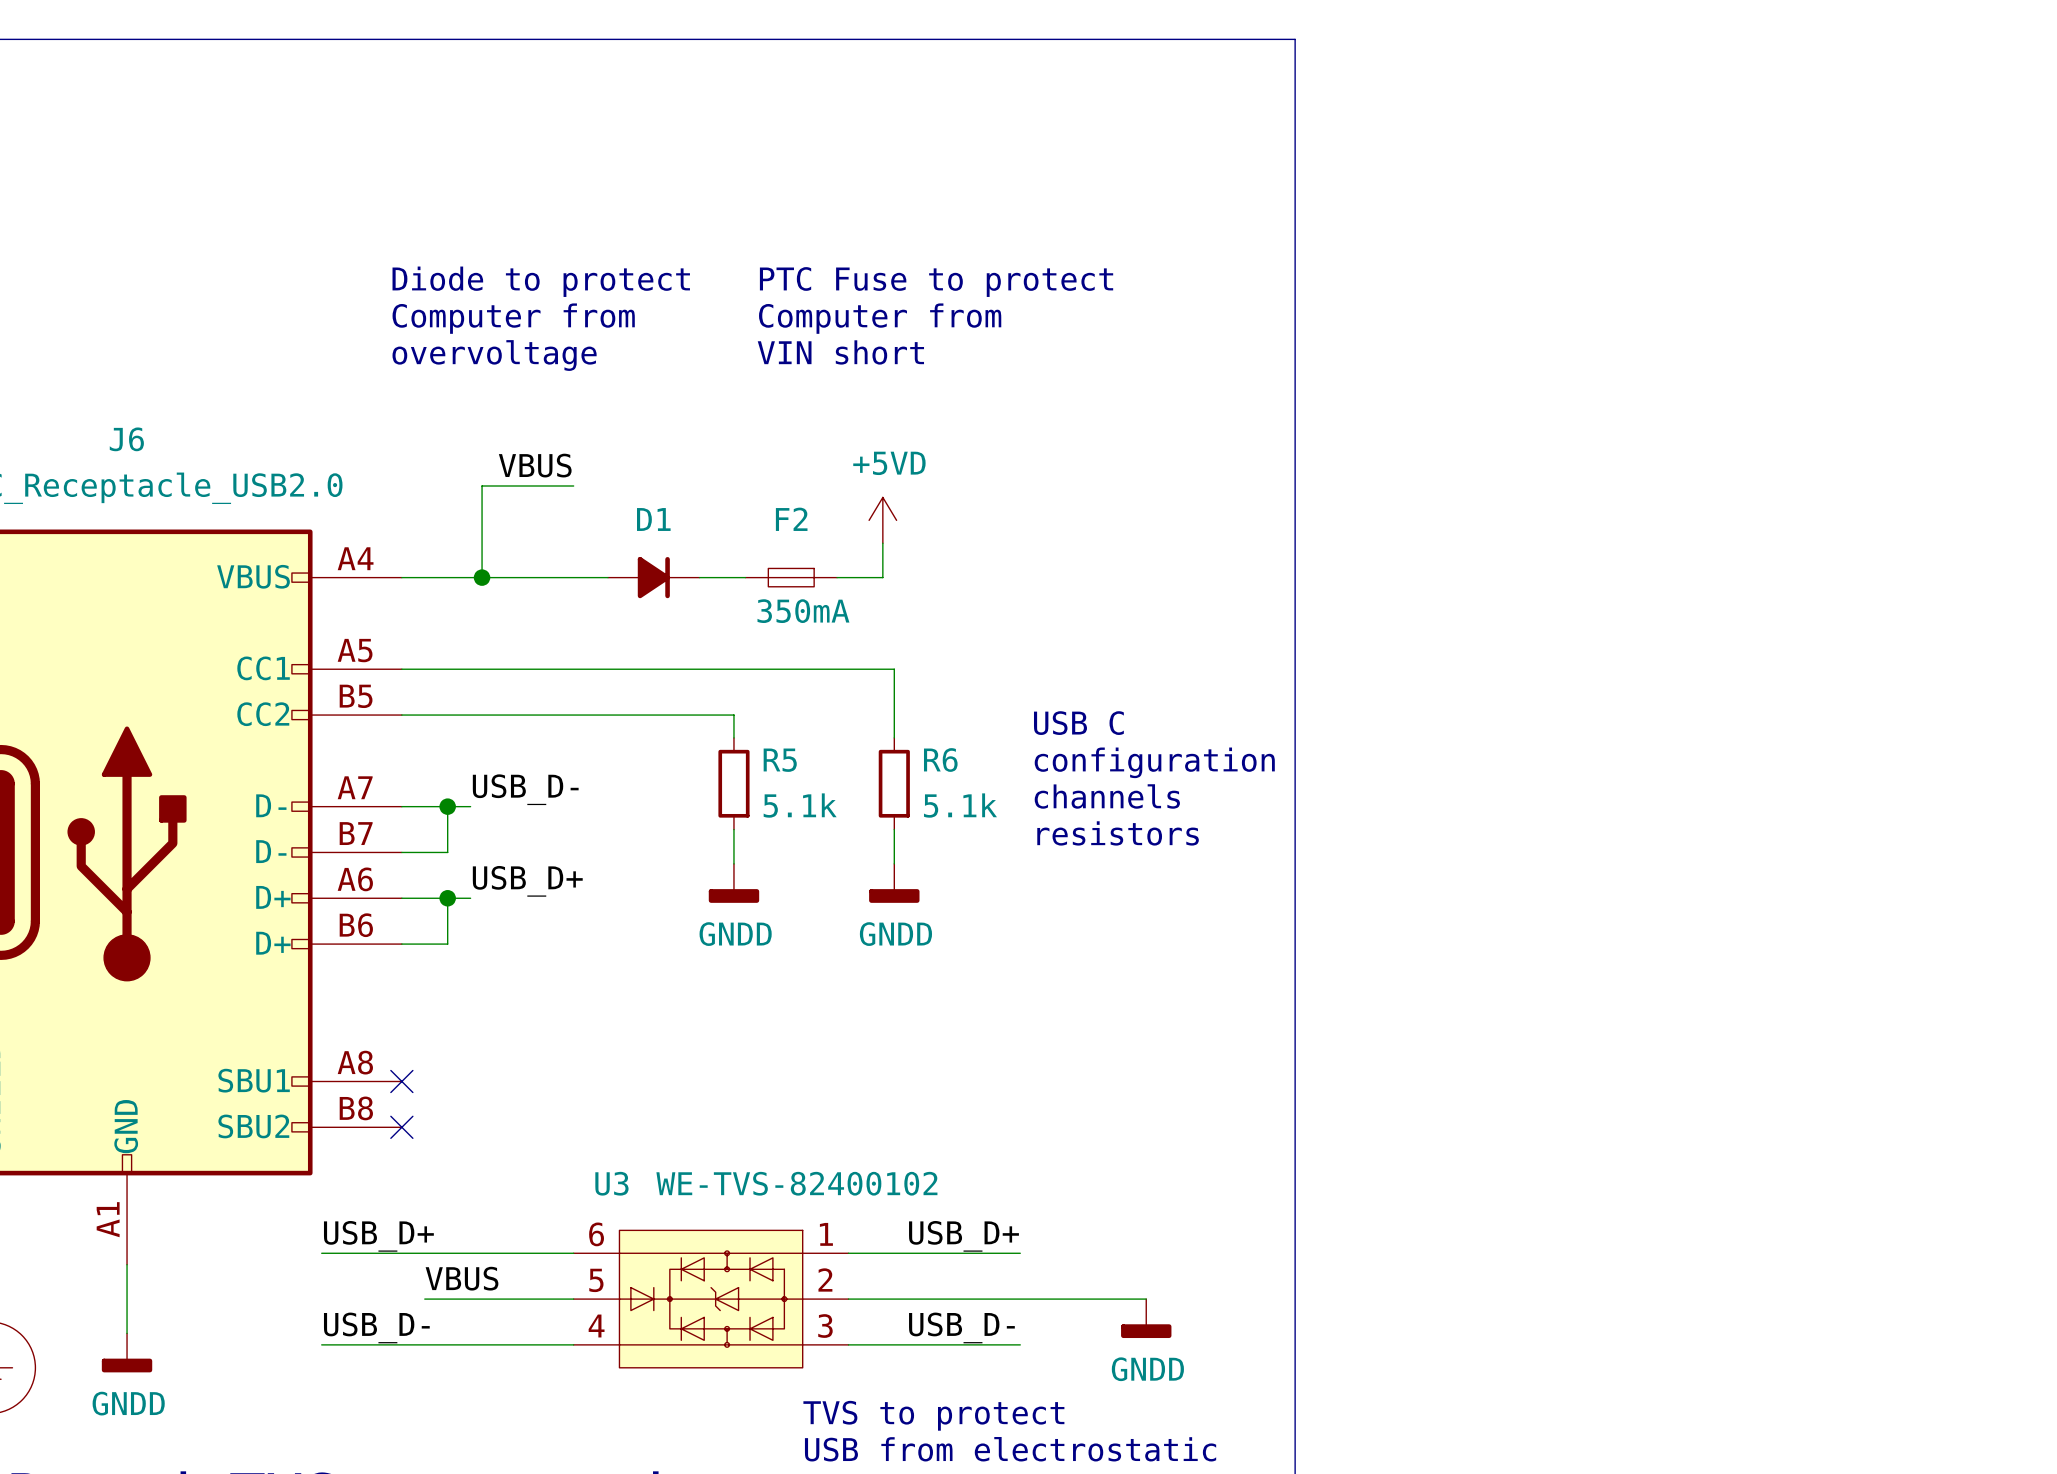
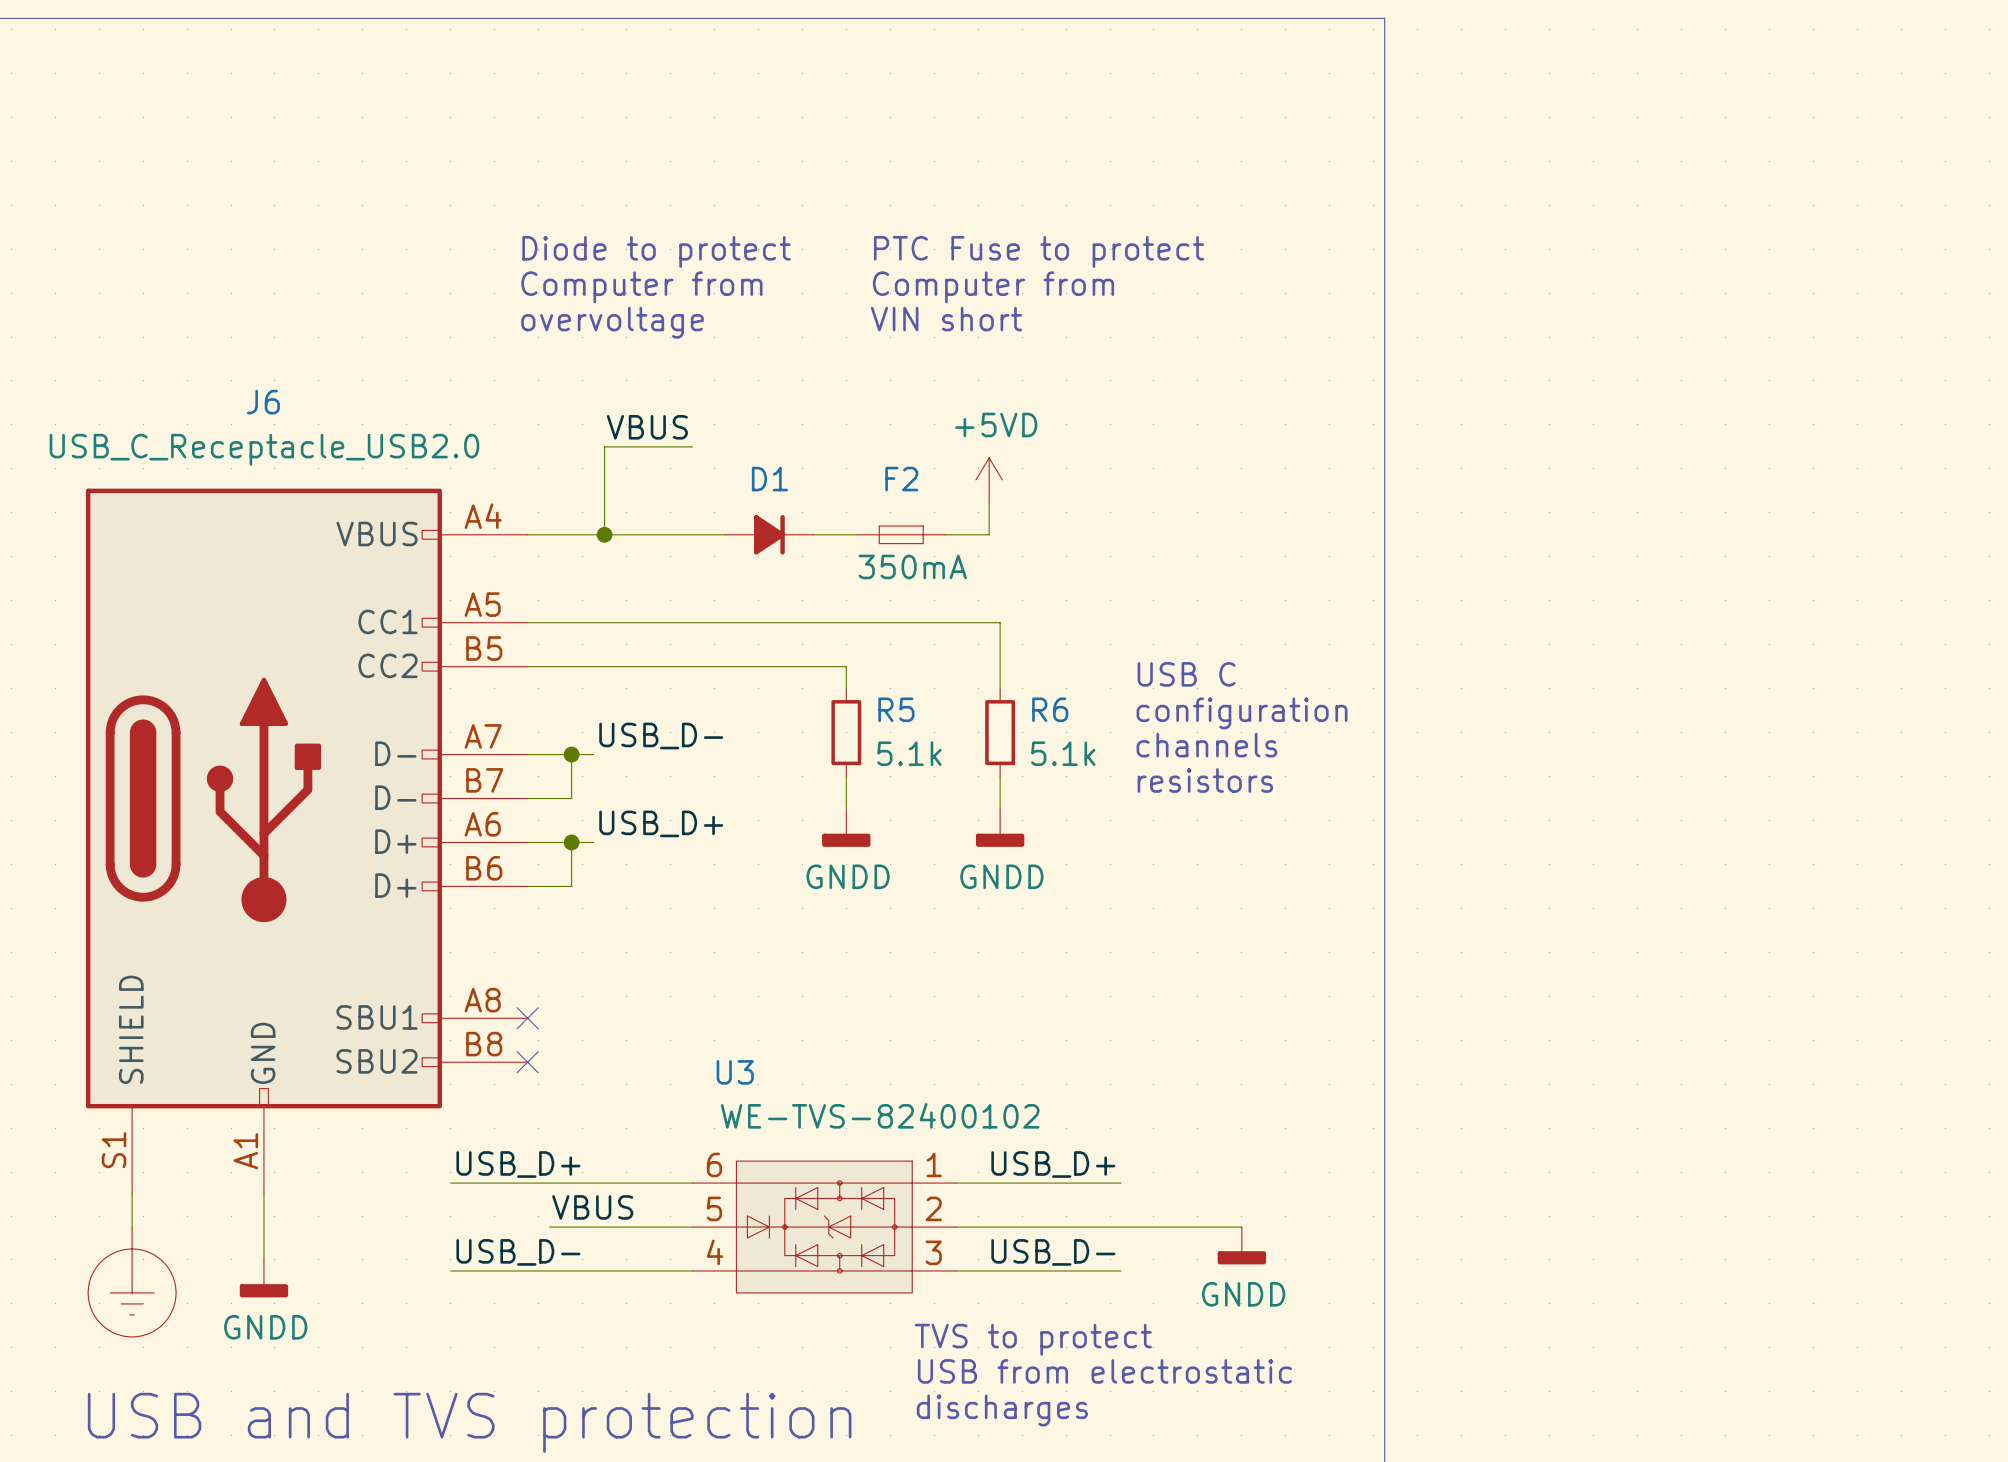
U3 name position: U3 (611, 1183) -> U3 (735, 1072)

